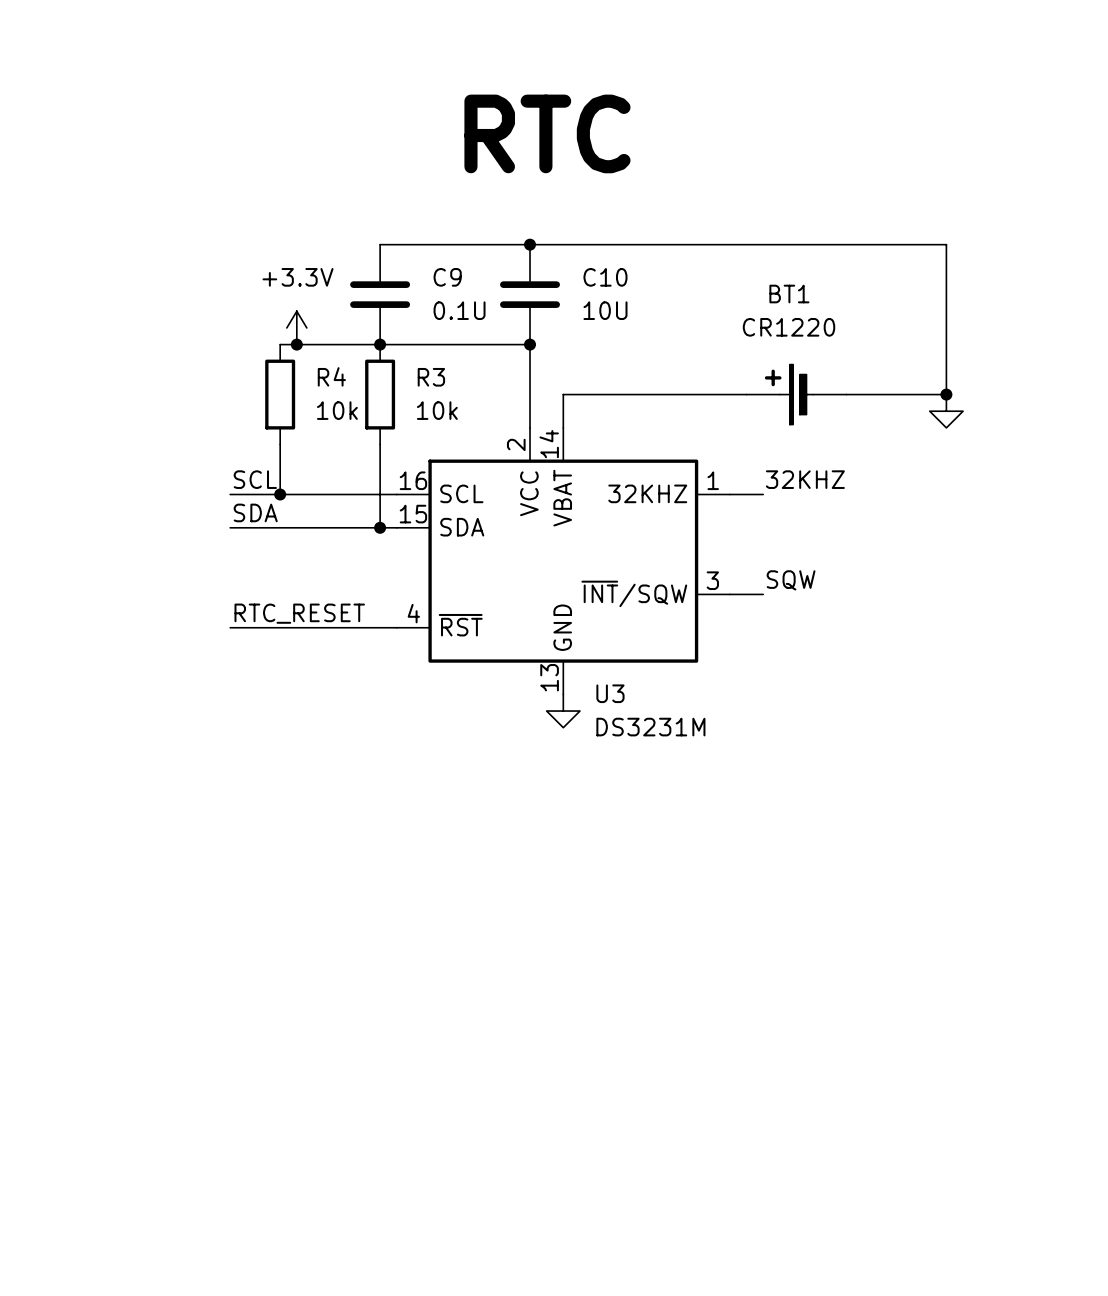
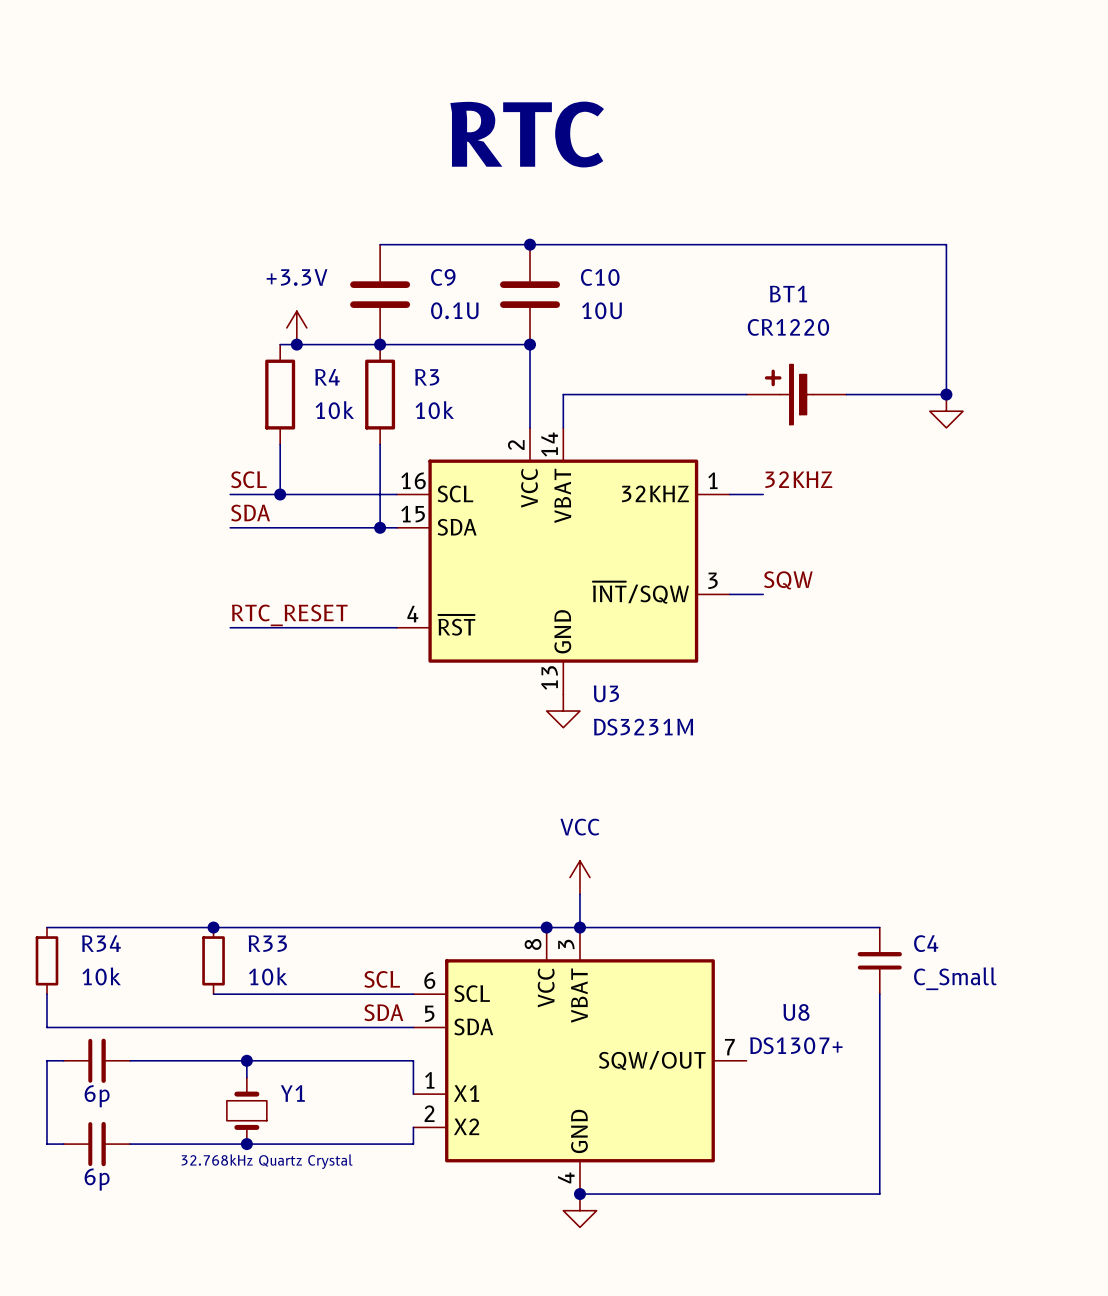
power symbol: none -> VCC (579, 877)
wire: none -> (579, 894) (579, 927)
wire: none -> (46, 927) (879, 927)
junction: none -> (213, 927)
junction: none -> (546, 927)
junction: none -> (579, 927)
R34: none -> 10k (46, 960)
R33: none -> 10k (213, 960)
C4: none -> C_Small (879, 960)
label: none -> SCL (382, 979)
wire: none -> (46, 994) (46, 1027) (413, 1027)
wire: none -> (213, 994) (413, 994)
wire: none -> (879, 994) (879, 1194) (579, 1194)
label: none -> SDA (383, 1012)
wire: none -> (63, 1060) (46, 1060) (46, 1144) (63, 1144)
part: none -> 6p (96, 1060)
wire: none -> (130, 1060) (413, 1060) (413, 1094)
wire: none -> (246, 1060) (246, 1077)
junction: none -> (246, 1060)
U8: none -> DS1307+ (579, 1060)
Y1: none -> 32.768kHz Quartz Crystal (246, 1110)
wire: none -> (413, 1127) (413, 1144) (130, 1144)
part: none -> 6p (96, 1144)
junction: none -> (246, 1144)
junction: none -> (579, 1194)
power symbol: none -> (579, 1210)

